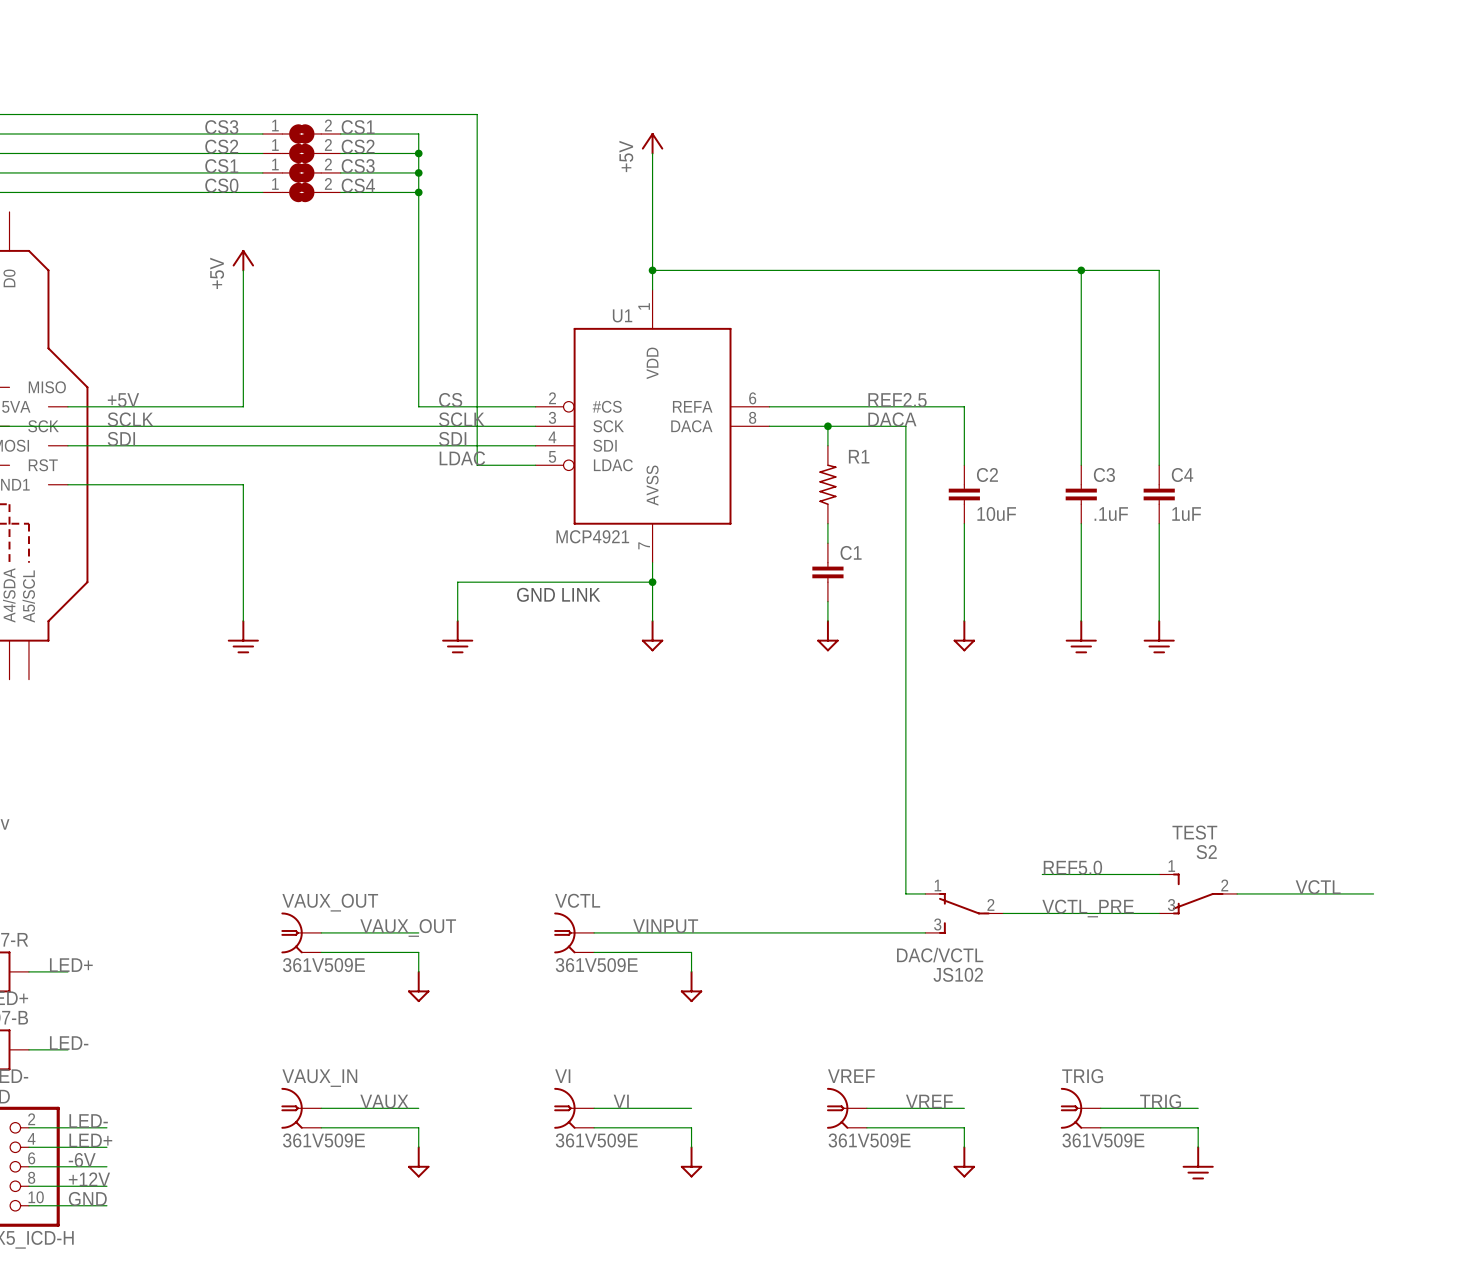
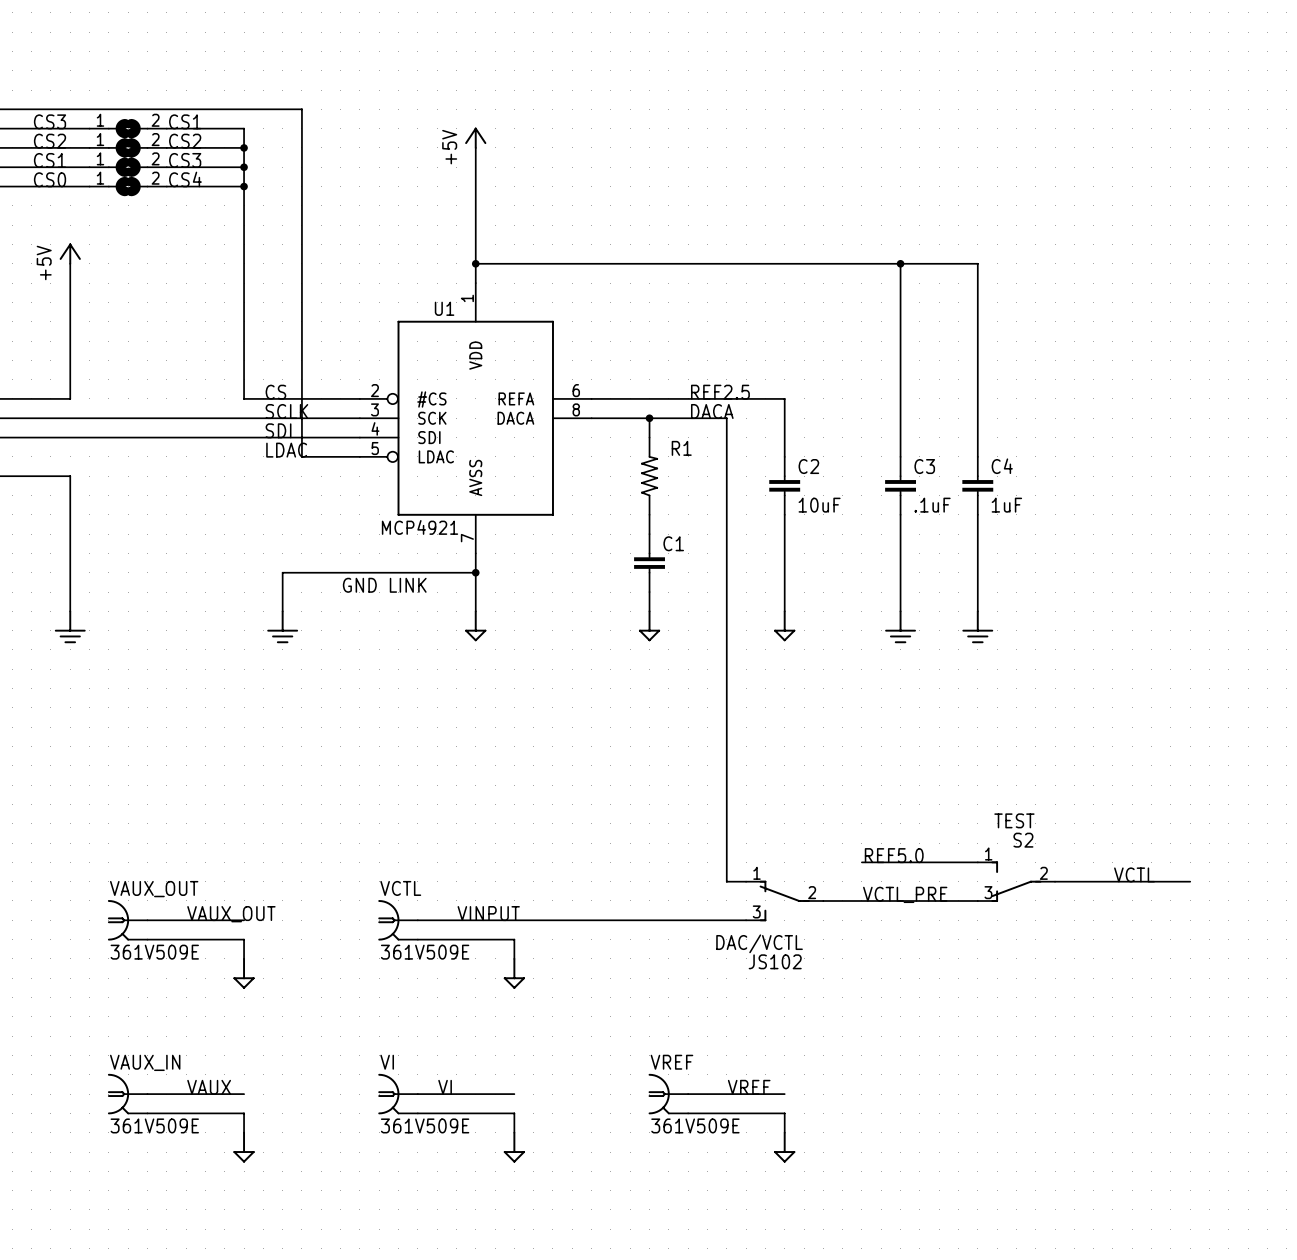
label: TRIG (1160, 1101) -> none
TRIG: 361V509E (1080, 1108) -> none
wire: (1100, 1108) (1198, 1108) -> none
wire: (1100, 1127) (1198, 1127) (1198, 1147) -> none
part: (1198, 1162) -> none

